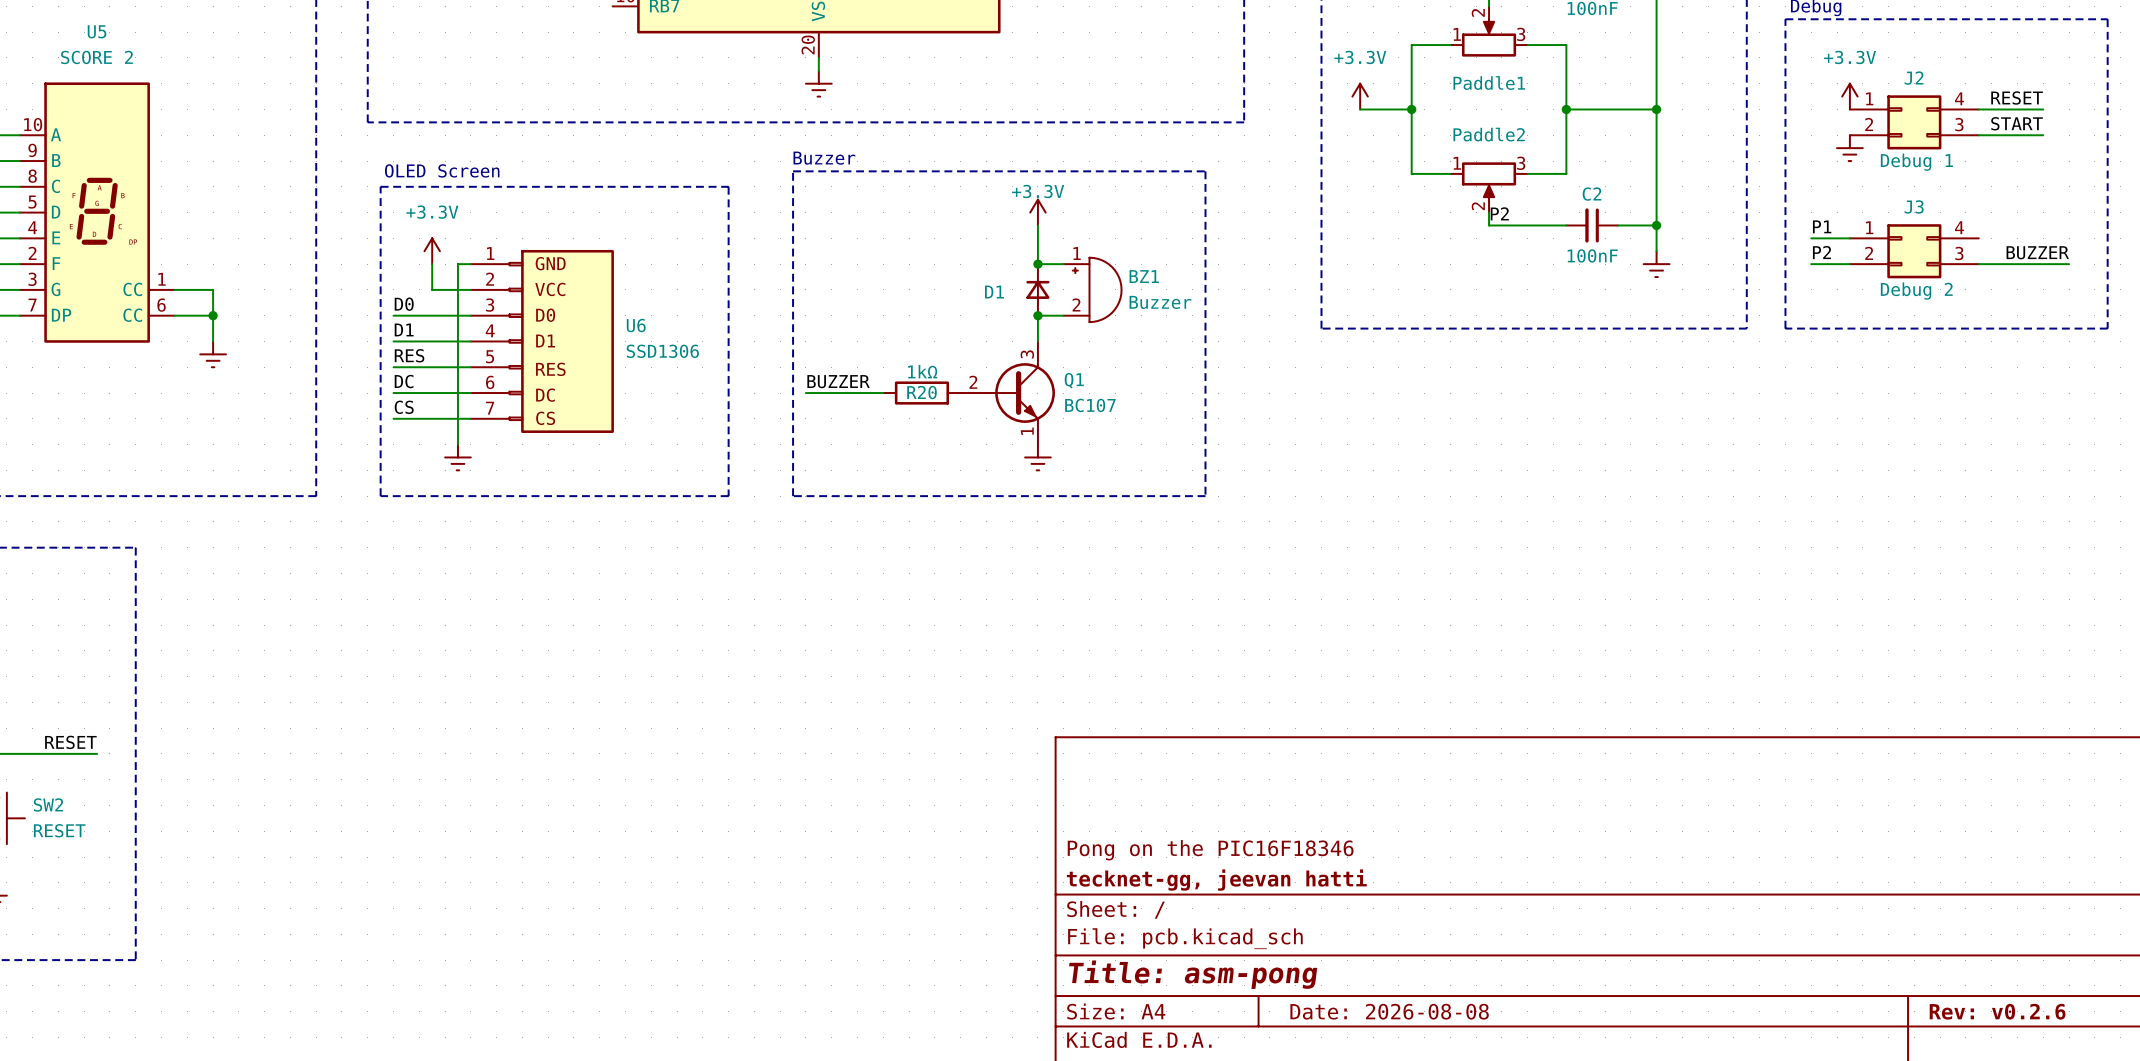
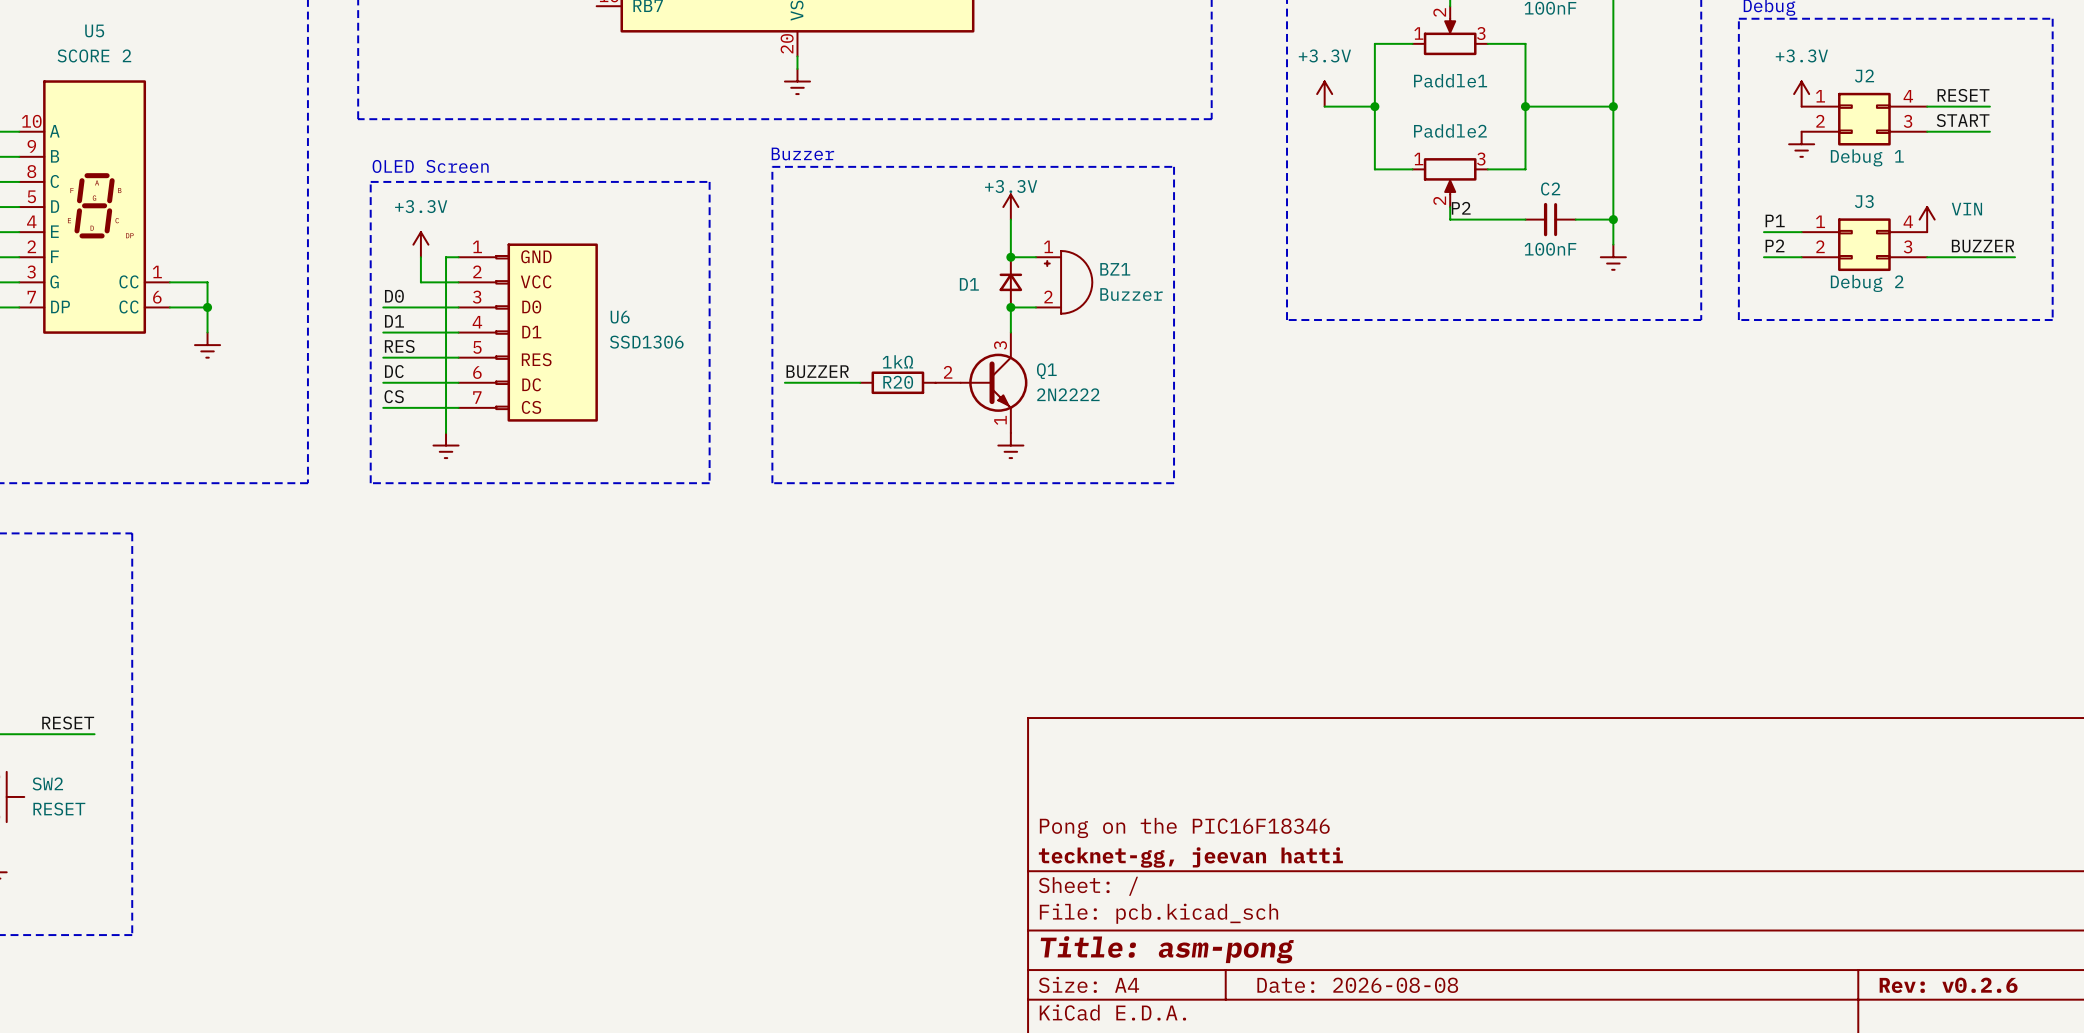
power symbol: none -> VIN (1927, 219)
Q1 value: BC107 (1090, 405) -> 2N2222 (1068, 394)

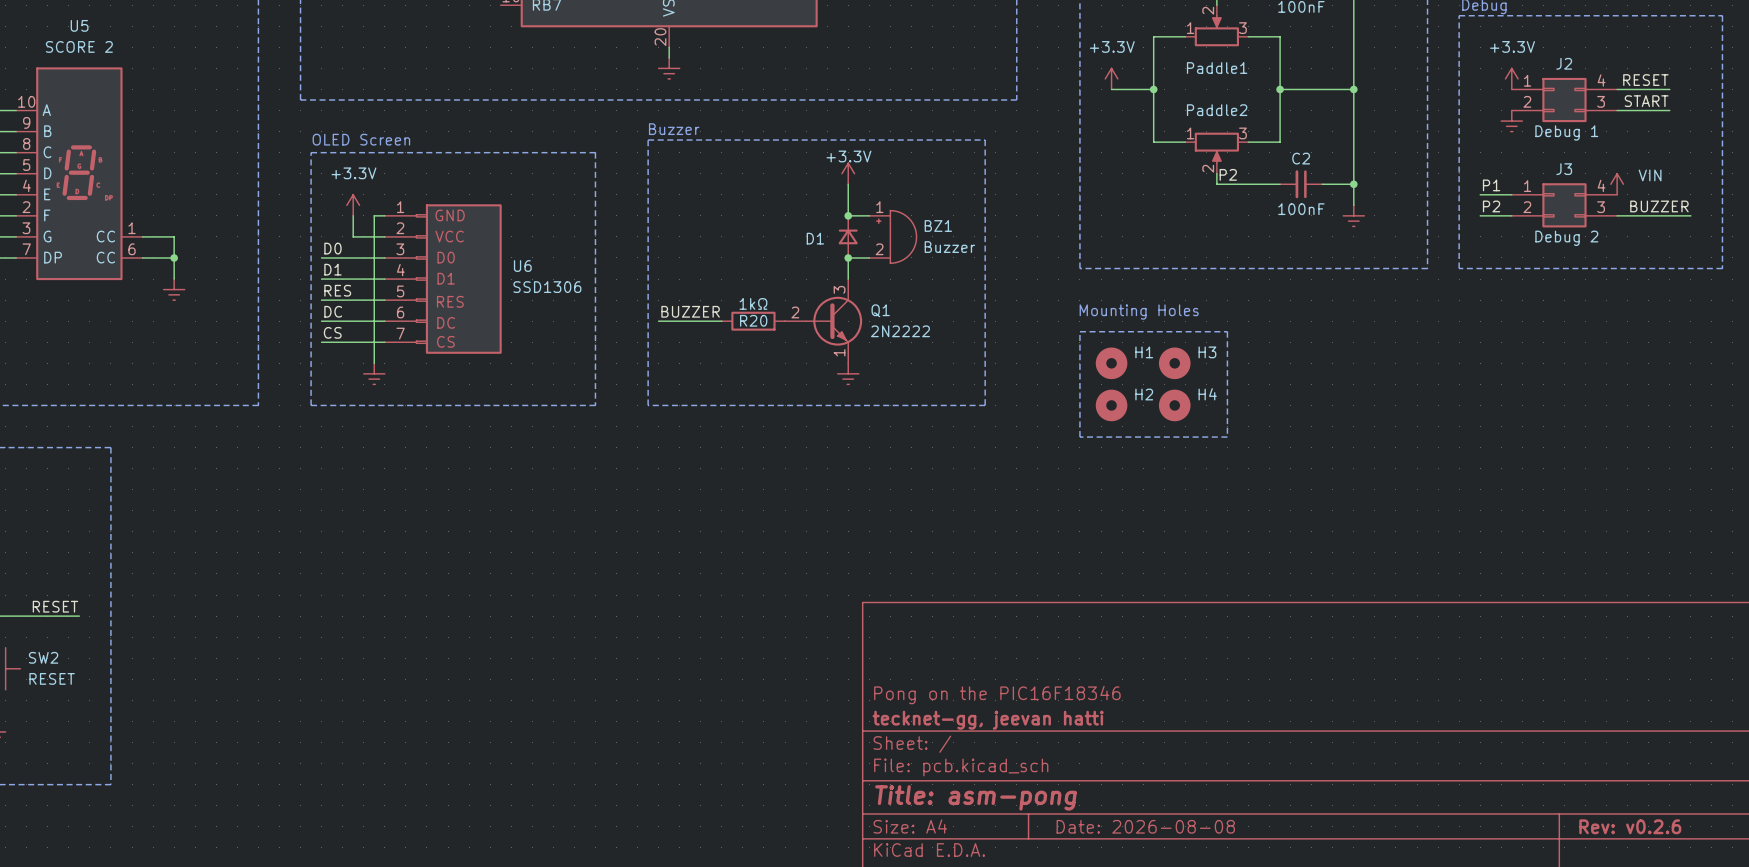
text: none -> Mounting Holes (1139, 312)
line: none -> (1079, 331) (1227, 331) (1227, 437) (1079, 437) (1079, 331)
H1: none -> (1111, 363)
H3: none -> (1174, 363)
H2: none -> (1111, 405)
H4: none -> (1174, 405)

